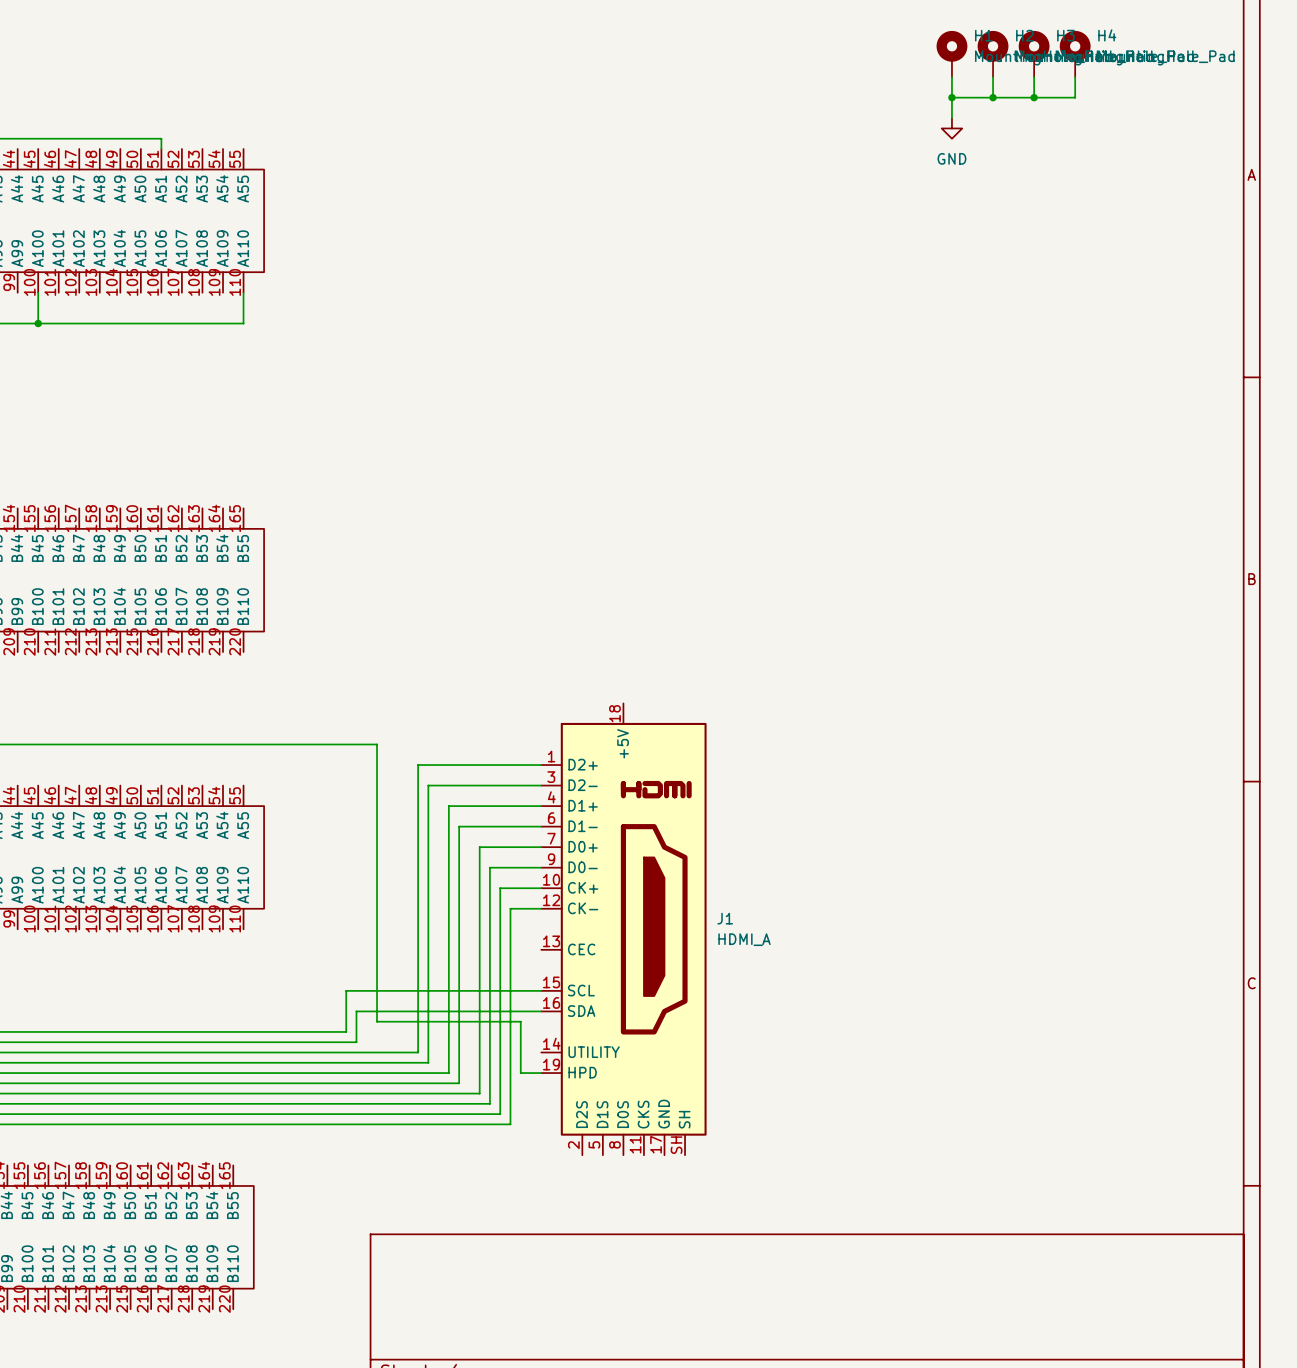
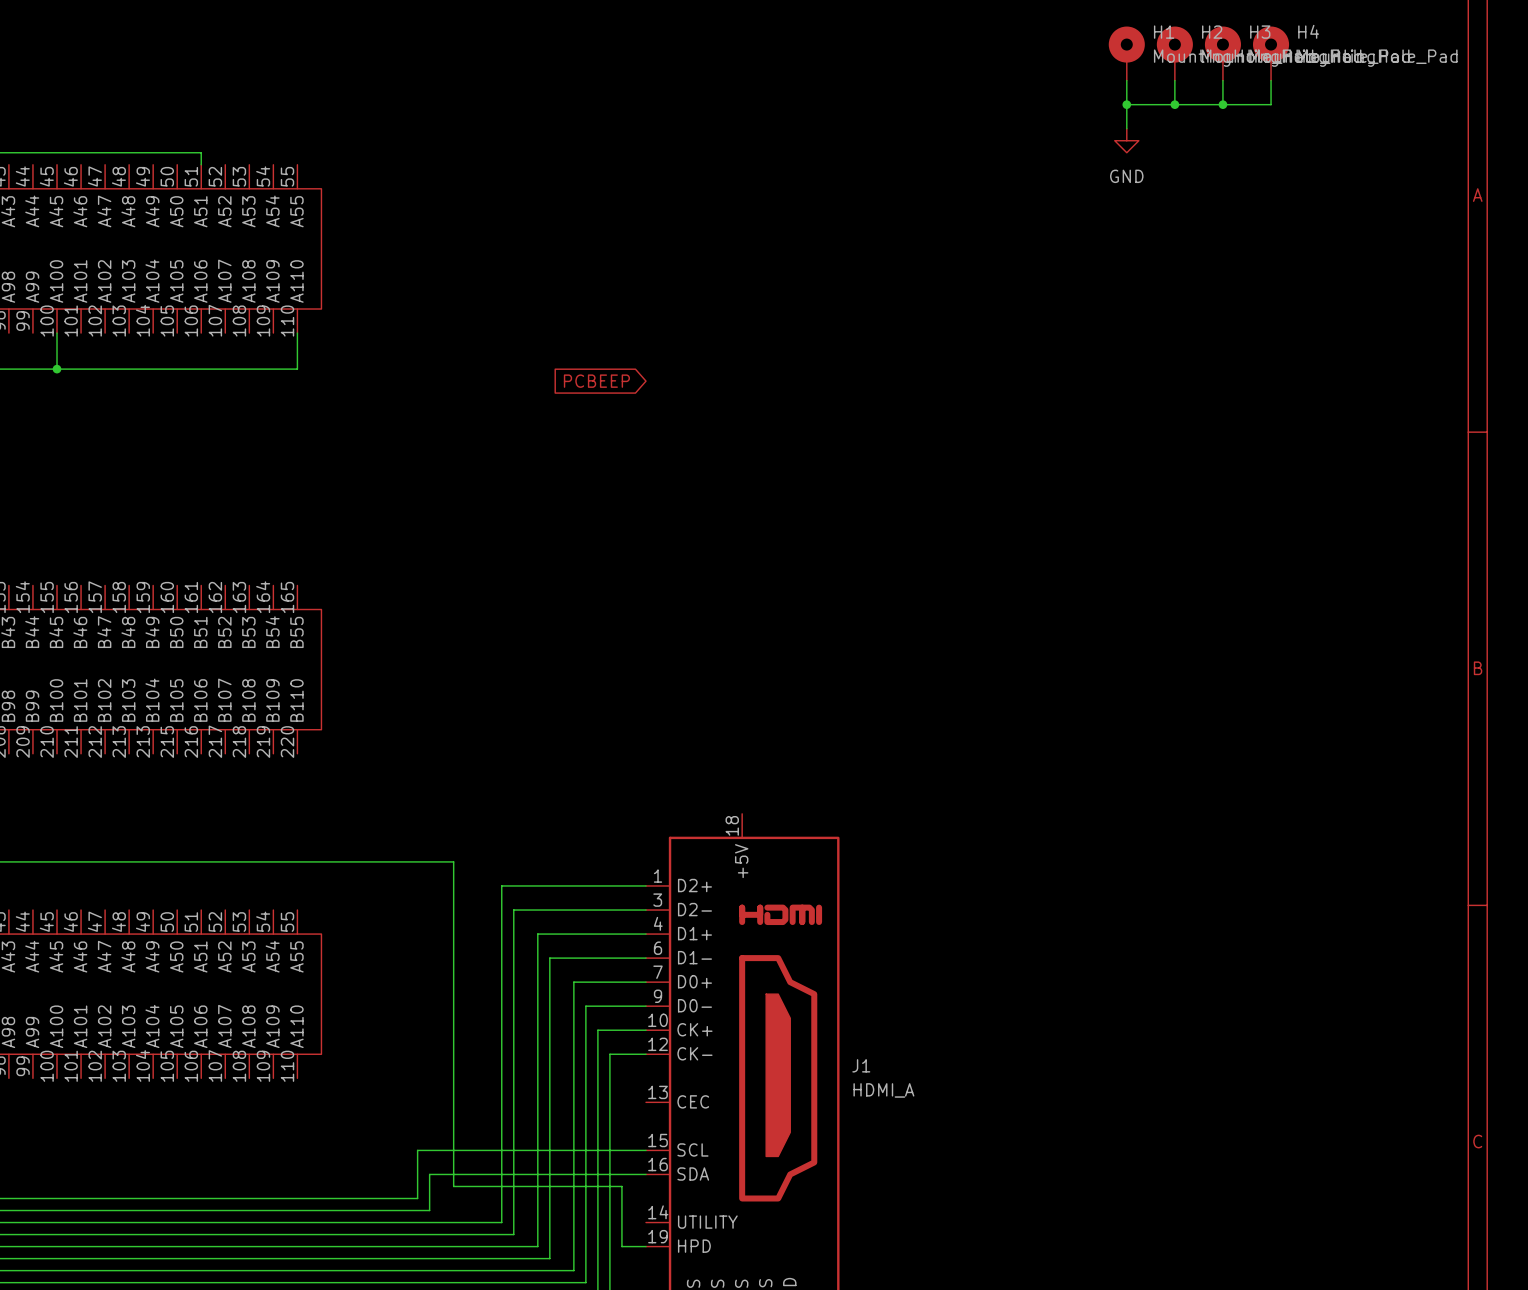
global label: none -> PCBEEP (596, 381)

